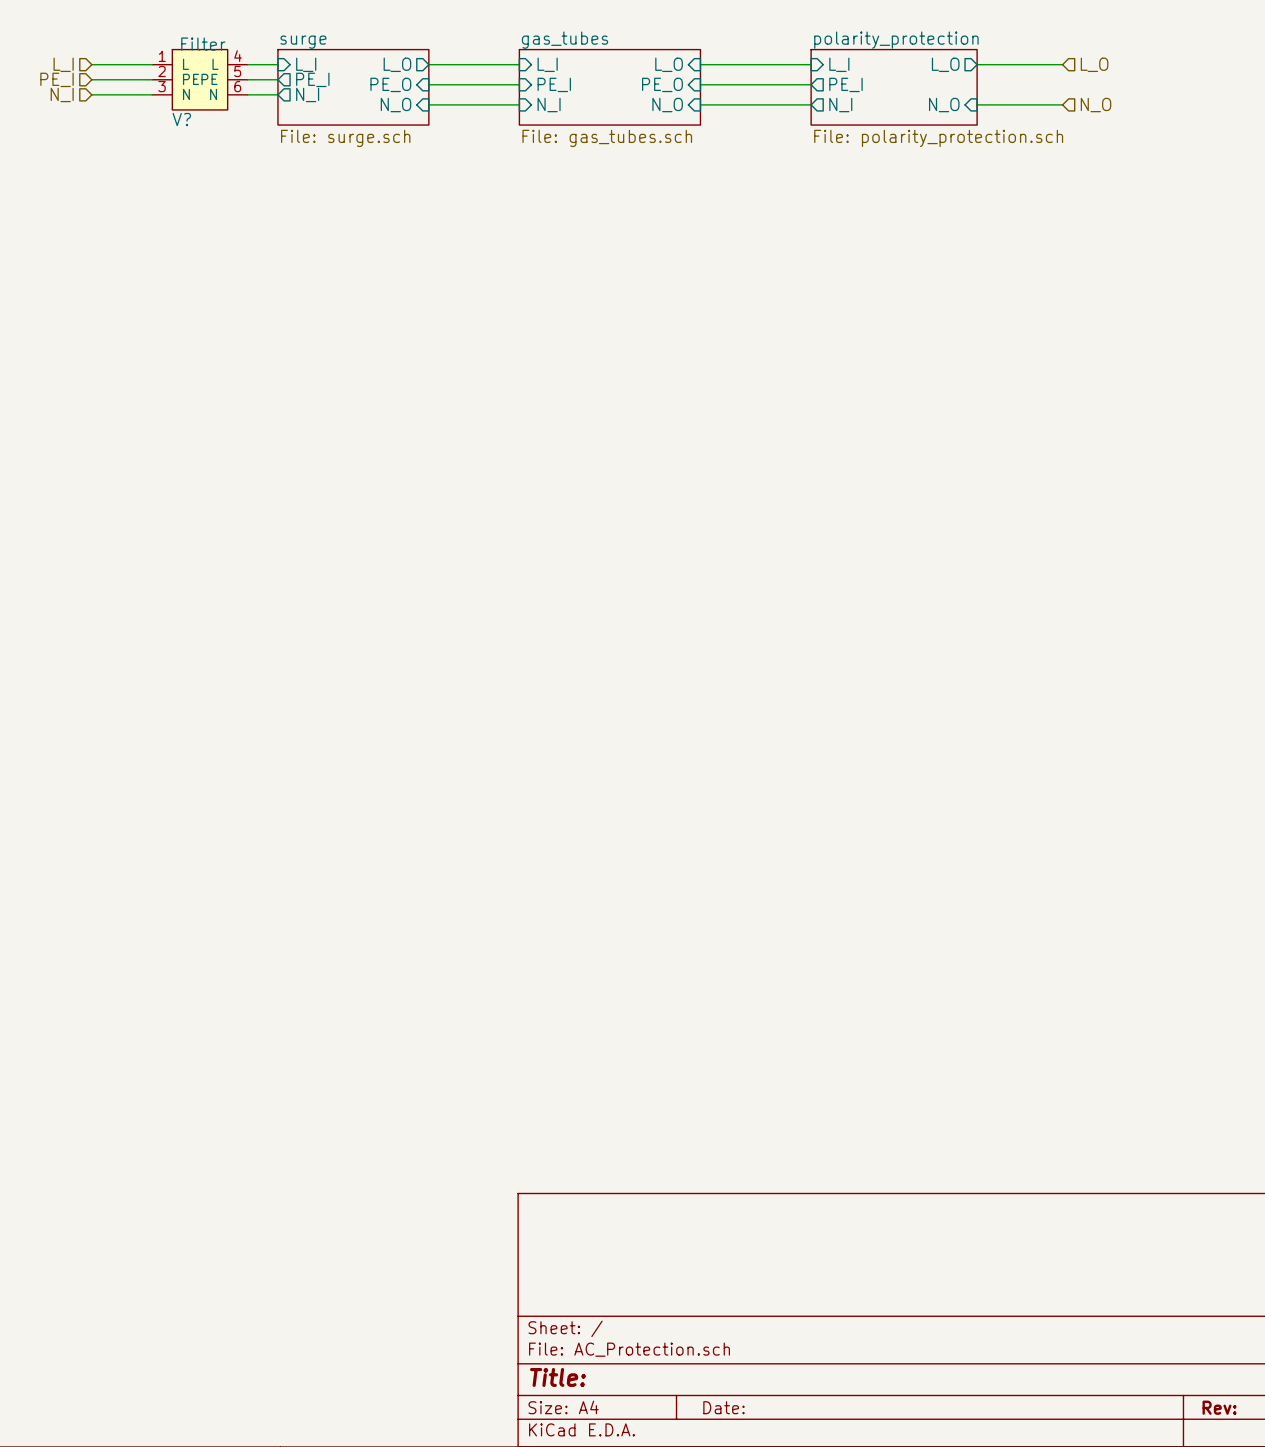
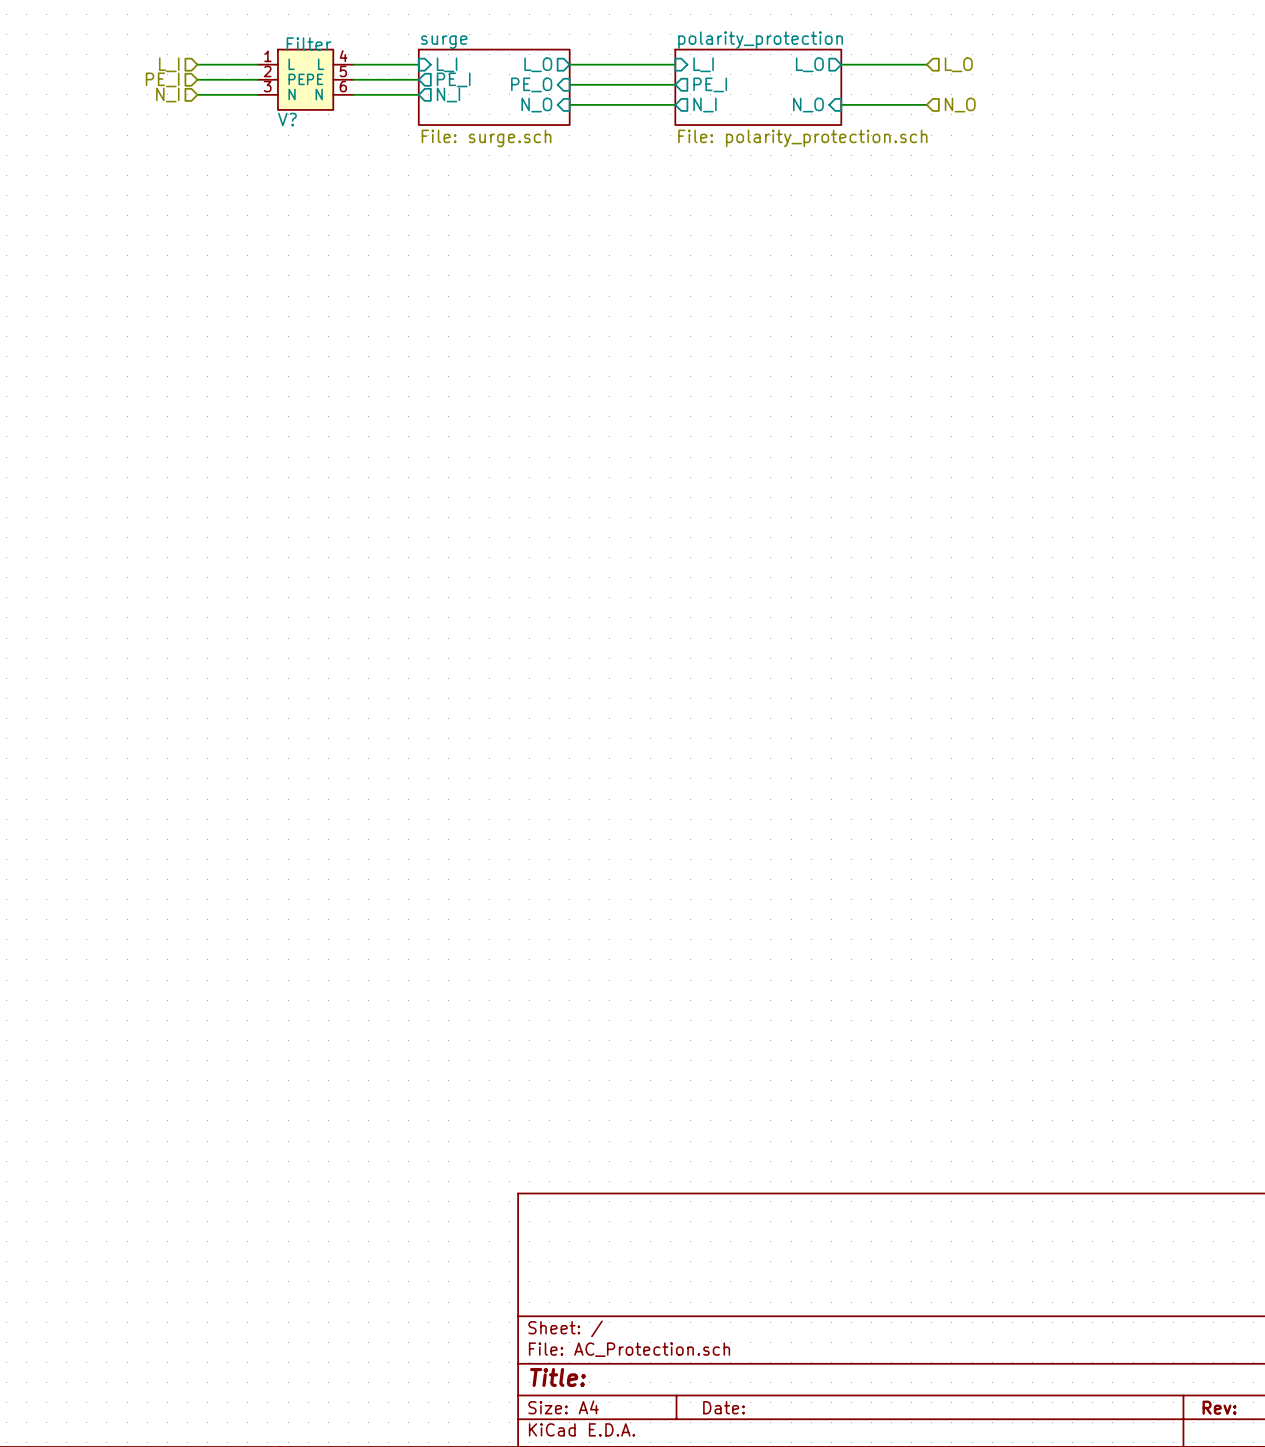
hierarchical label position: L_I (63, 64) -> L_I (169, 64)
wire: (91, 64) (152, 64) -> none
sheet pin: L_I (306, 64) -> none
wire: none -> (353, 64) (418, 64)
sheet pin: L_O (397, 64) -> none
wire: (428, 64) (519, 64) -> none
sheet pin: none -> L_I (447, 64)
sheet pin shape: input (547, 64) -> output (538, 64)
sheet pin: L_I (547, 64) -> L_O (538, 64)
wire: none -> (569, 64) (675, 64)
sheet pin: L_O (669, 64) -> L_I (703, 64)
wire: (700, 64) (811, 64) -> none
sheet pin shape: input (839, 64) -> output (809, 64)
sheet pin: L_I (839, 64) -> L_O (809, 64)
sheet pin: L_O (945, 64) -> none
wire: (977, 64) (1062, 64) -> (841, 64) (926, 64)
hierarchical label position: L_O (1094, 64) -> L_O (958, 64)
hierarchical label position: PE_I (57, 79) -> PE_I (162, 79)
wire: (91, 79) (152, 79) -> none
V? position: (200, 79) -> (305, 79)
sheet pin: PE_I (312, 79) -> none
wire: none -> (353, 79) (418, 79)
sheet pin: none -> PE_I (453, 79)
sheet pin: PE_O (390, 84) -> none
wire: (428, 84) (519, 84) -> none
sheet pin: PE_I (554, 84) -> PE_O (531, 84)
wire: none -> (569, 84) (675, 84)
sheet pin shape: input (662, 84) -> output (710, 84)
sheet pin: PE_O (662, 84) -> PE_I (710, 84)
wire: (700, 84) (811, 84) -> none
sheet pin: PE_I (845, 84) -> none
sheet surge position: (353, 87) -> (494, 87)
sheet gas_tubes: File: gas_tubes.sch (609, 87) -> none
sheet polarity_protection position: (894, 87) -> (758, 87)
hierarchical label position: N_I (62, 94) -> N_I (167, 94)
wire: (91, 94) (152, 94) -> none
sheet pin: N_I (307, 94) -> none
wire: none -> (353, 94) (418, 94)
sheet pin: none -> N_I (448, 94)
wire: (428, 104) (519, 104) -> none
wire: none -> (569, 104) (675, 104)
wire: (700, 104) (811, 104) -> none
wire: (977, 104) (1062, 104) -> (841, 104) (926, 104)
sheet pin: N_O (396, 105) -> none
sheet pin: N_I (549, 105) -> N_O (536, 105)
sheet pin shape: input (667, 105) -> output (704, 105)
sheet pin: N_O (667, 105) -> N_I (704, 105)
sheet pin shape: output (840, 105) -> input (808, 105)
sheet pin: N_I (840, 105) -> N_O (808, 105)
sheet pin: N_O (944, 105) -> none
hierarchical label position: N_O (1096, 105) -> N_O (960, 105)

